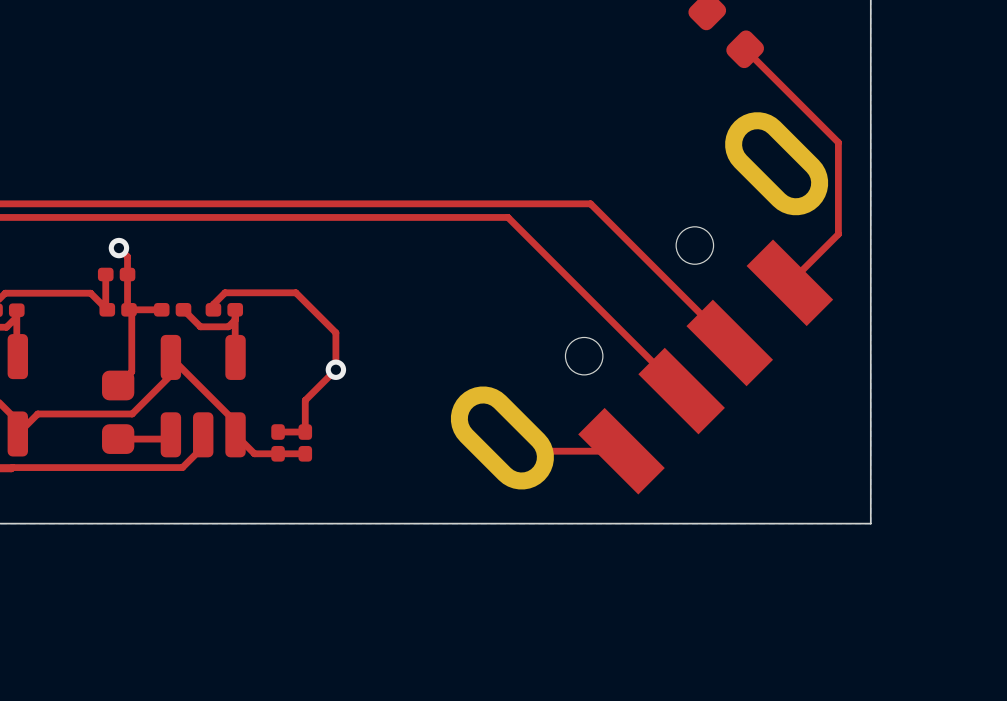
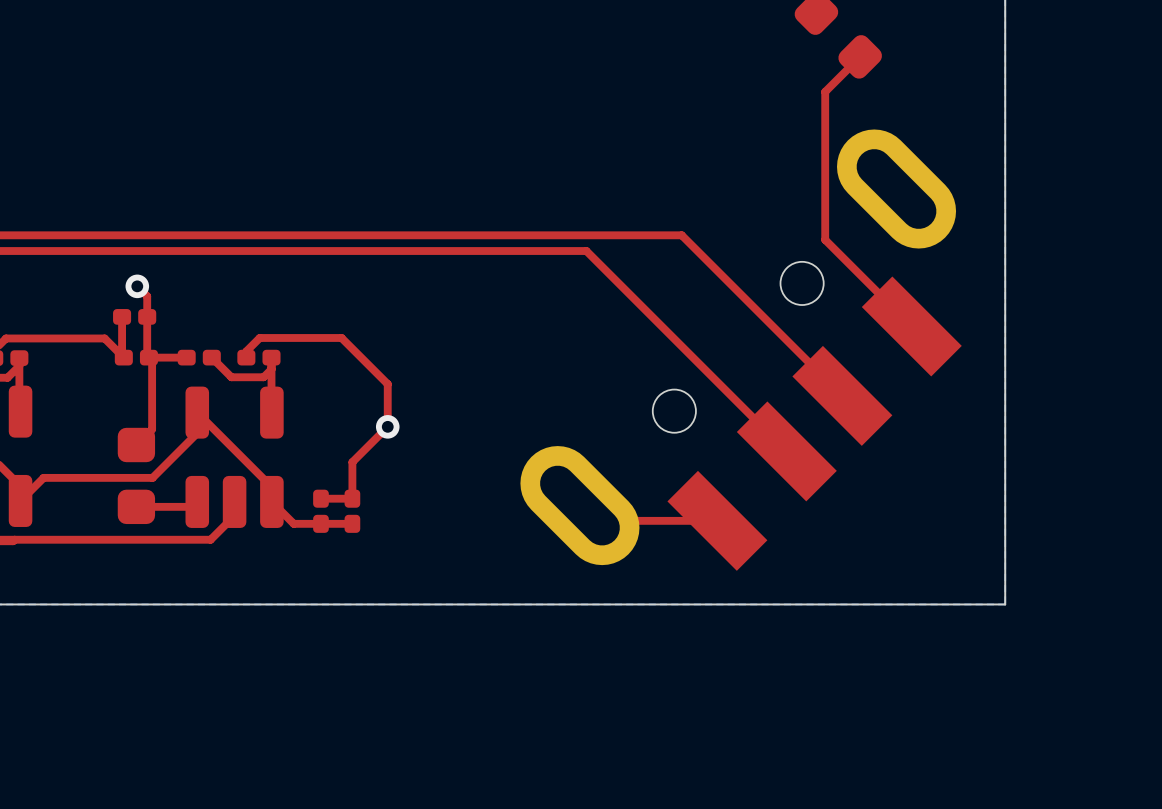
top track: (745, 49) (838, 142) (838, 234) (789, 282) -> (860, 56) (825, 91) (825, 239) (911, 326)

